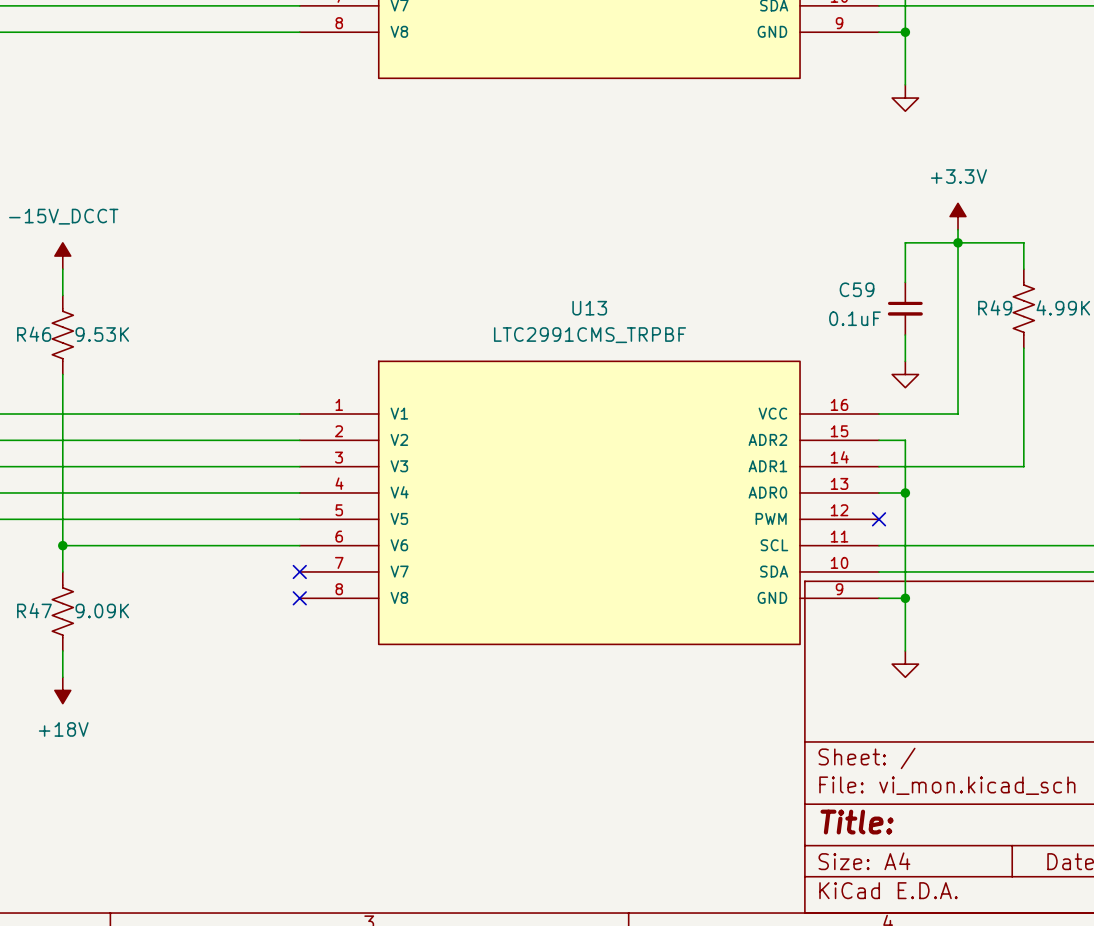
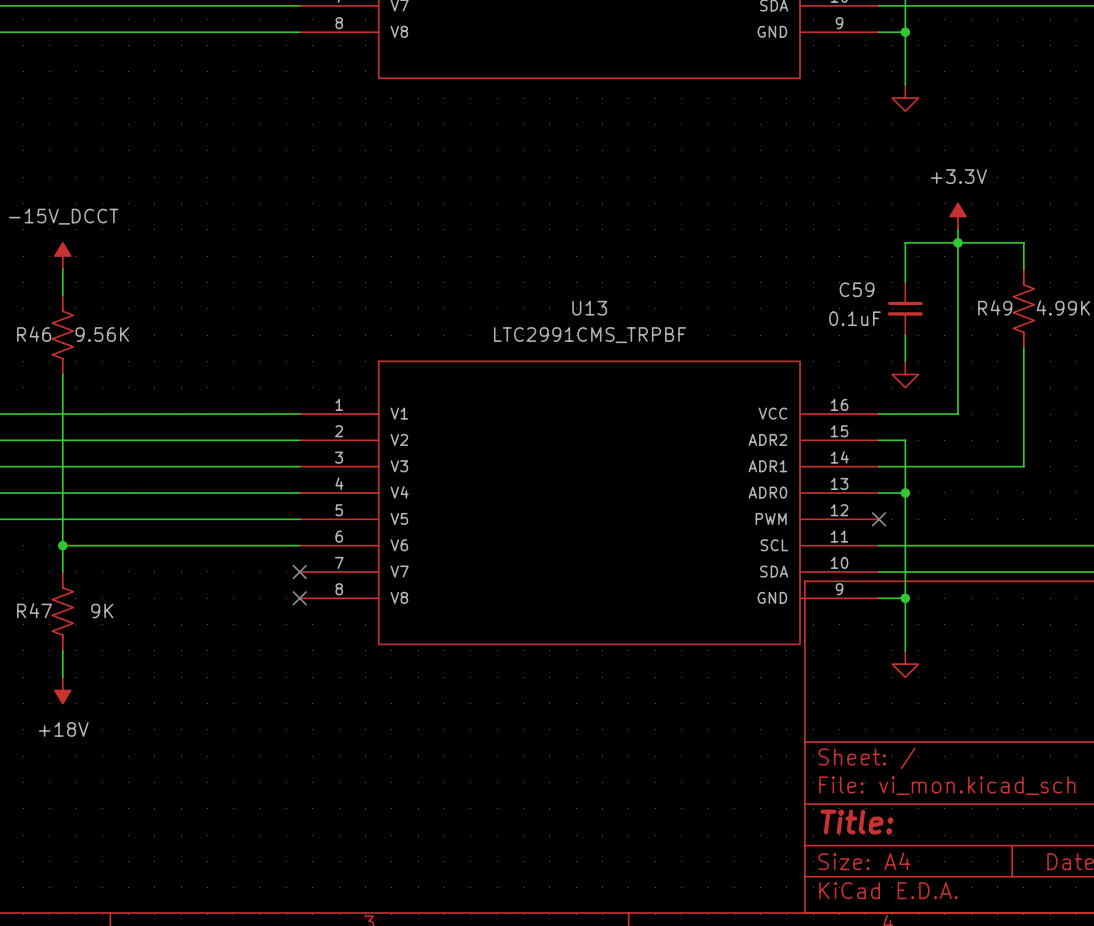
R46 value: 9.53K (102, 334) -> 9.56K (102, 334)
R47 value: 9.09K (102, 610) -> 9K (102, 610)

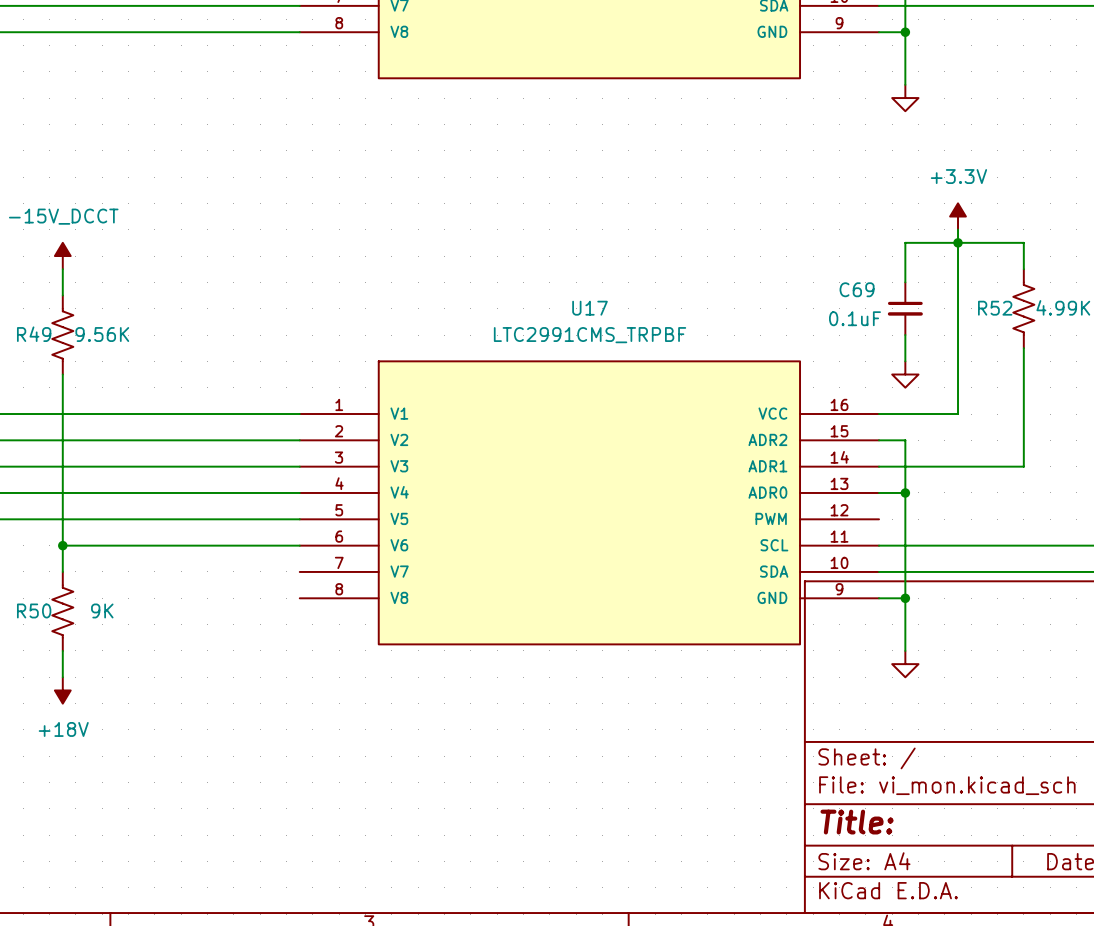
C59 name: C59 (857, 289) -> C69 (857, 289)
R49 name: R49 (995, 307) -> R52 (995, 308)
U13 name: U13 (589, 308) -> U17 (590, 308)
R46 name: R46 (34, 334) -> R49 (34, 334)
no-connect mark: (879, 519) -> none
no-connect mark: (299, 571) -> none
no-connect mark: (299, 598) -> none
R47 name: R47 (34, 610) -> R50 (34, 610)

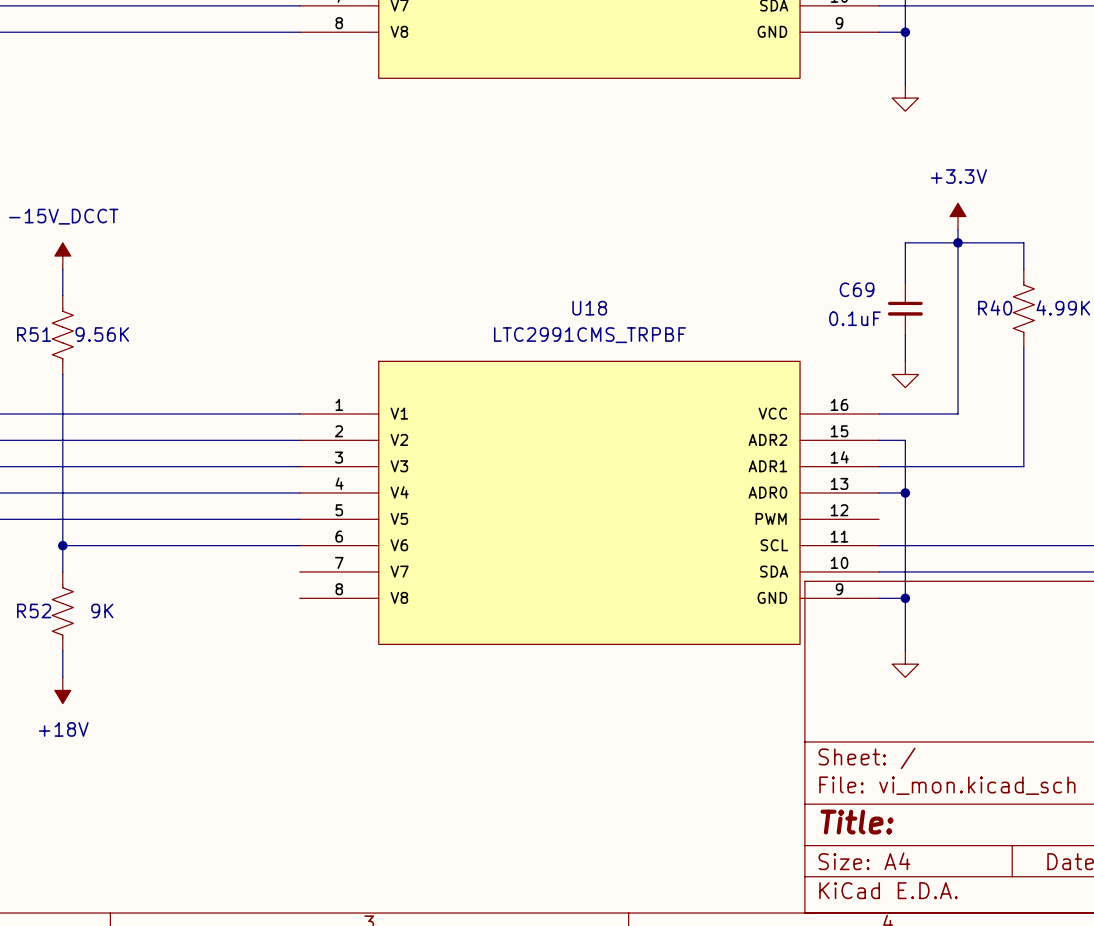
U17 name: U17 (590, 308) -> U18 (589, 308)
R52 name: R52 (995, 308) -> R40 (995, 307)
R49 name: R49 (34, 334) -> R51 (34, 334)
R50 name: R50 (34, 610) -> R52 (34, 610)

